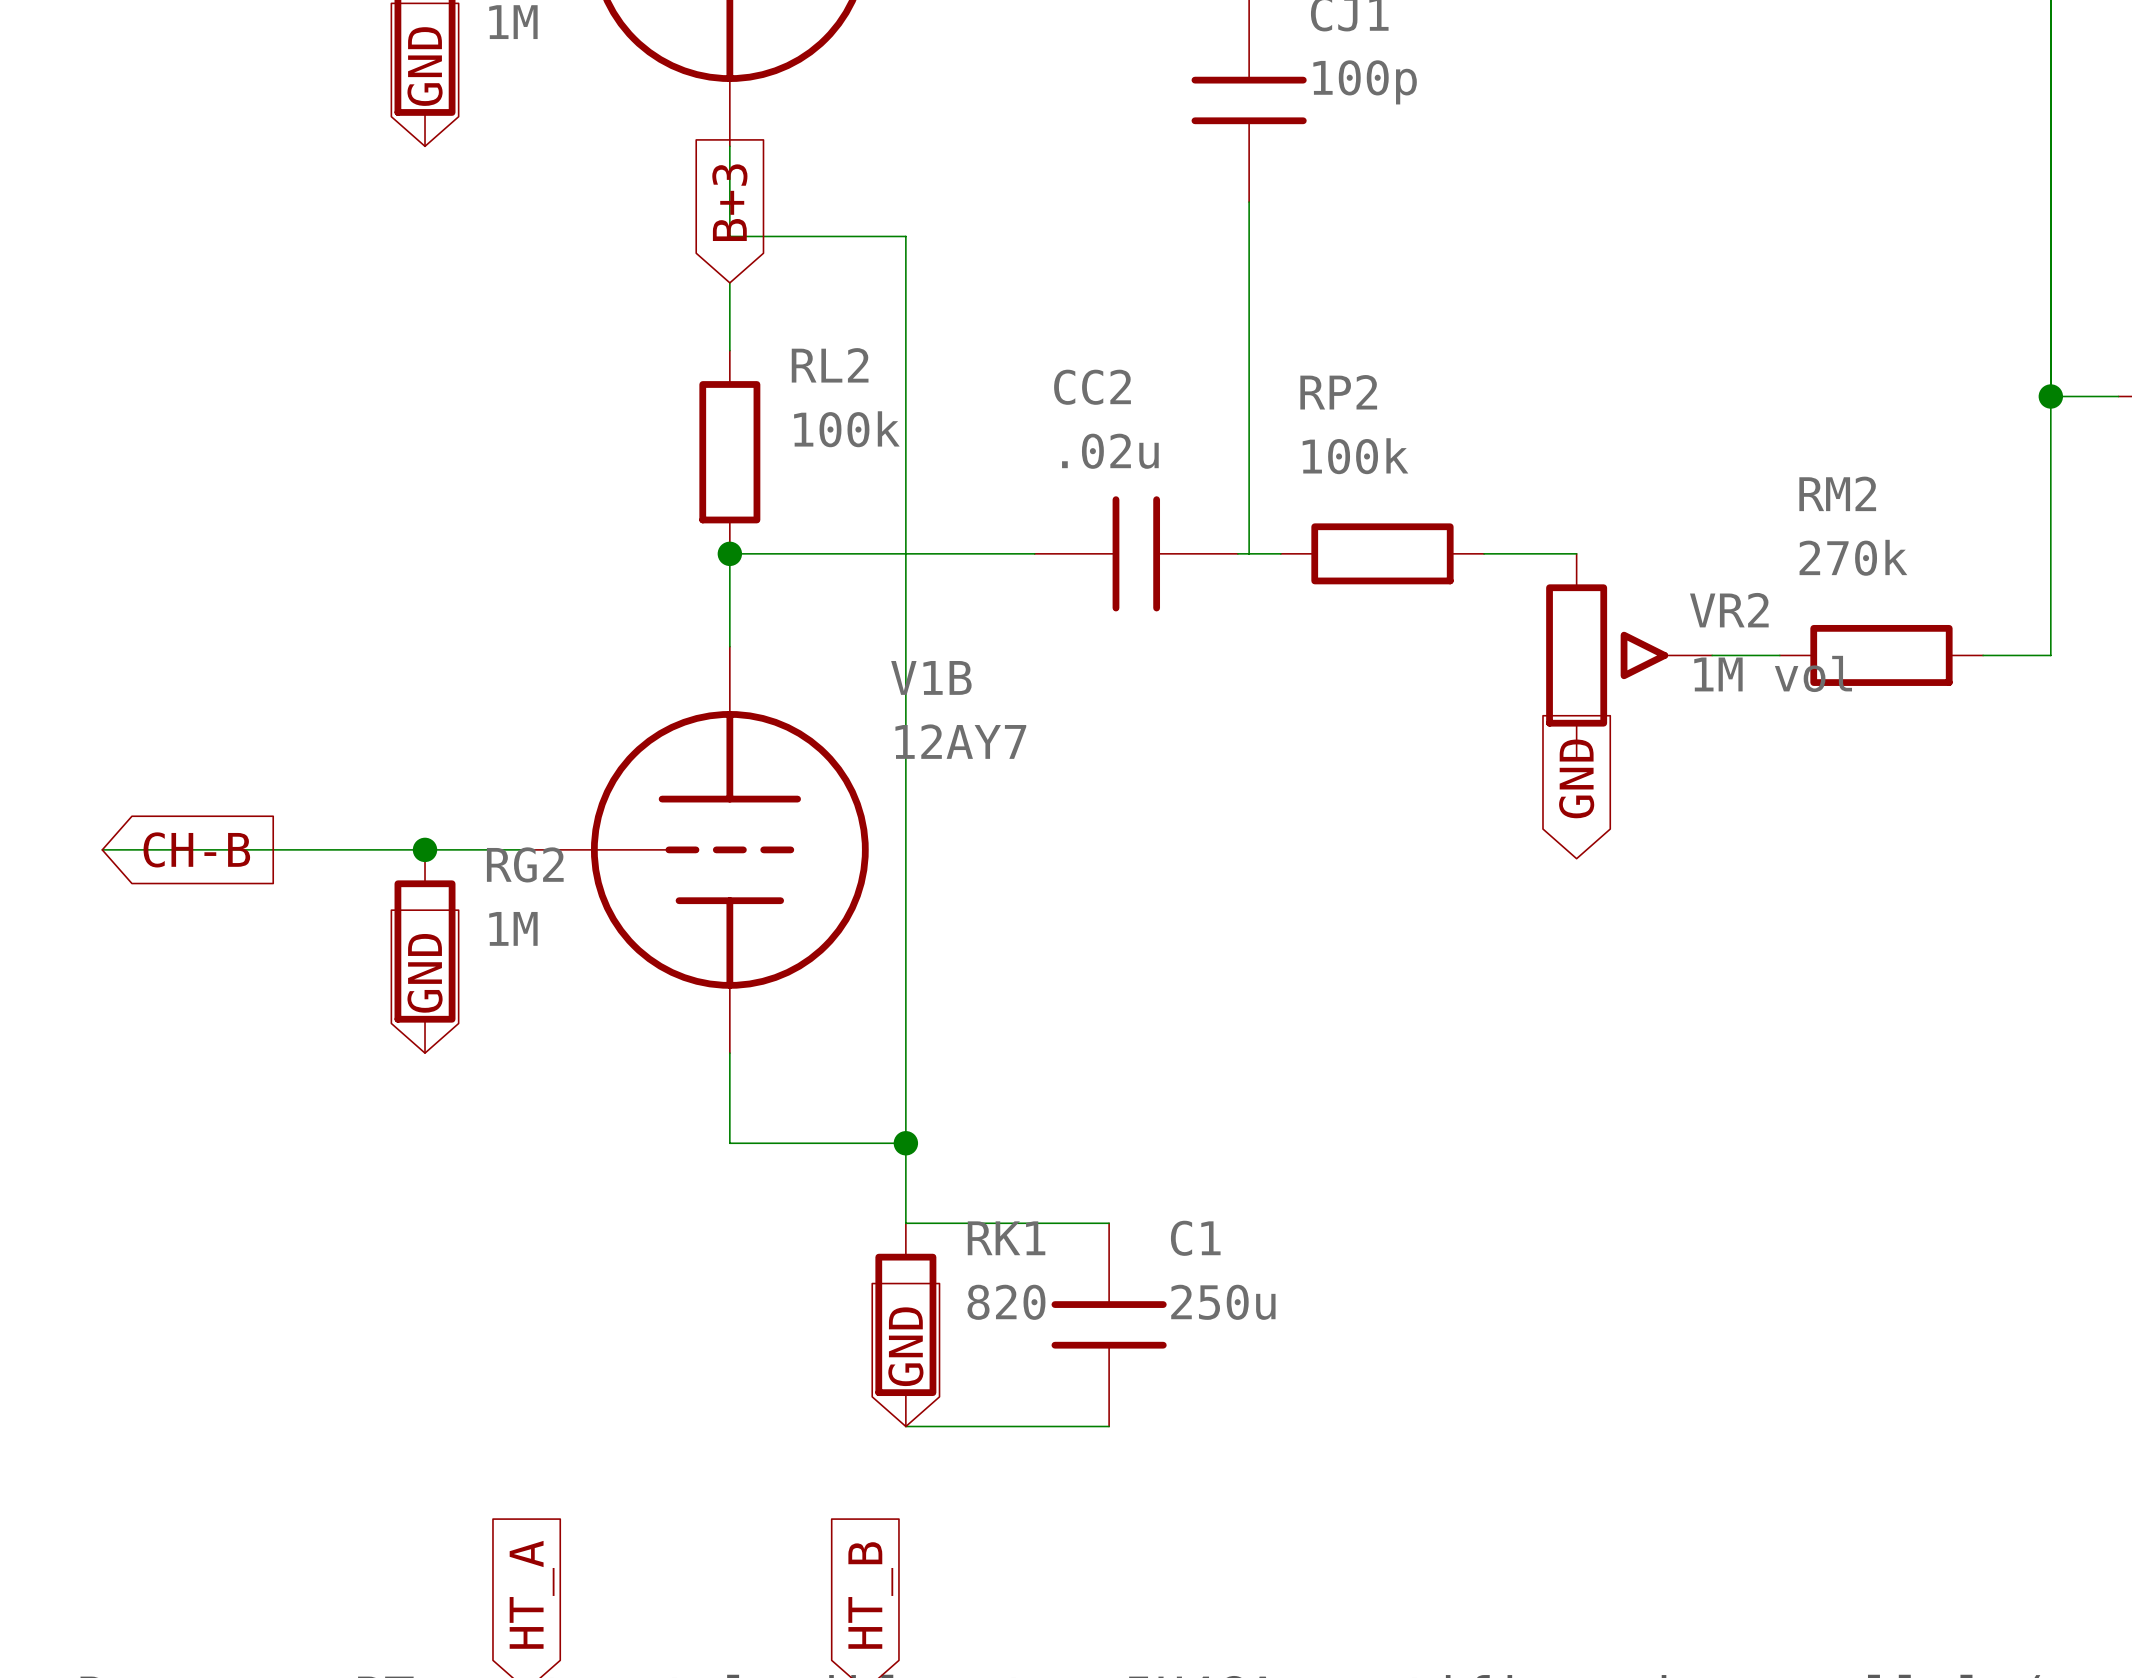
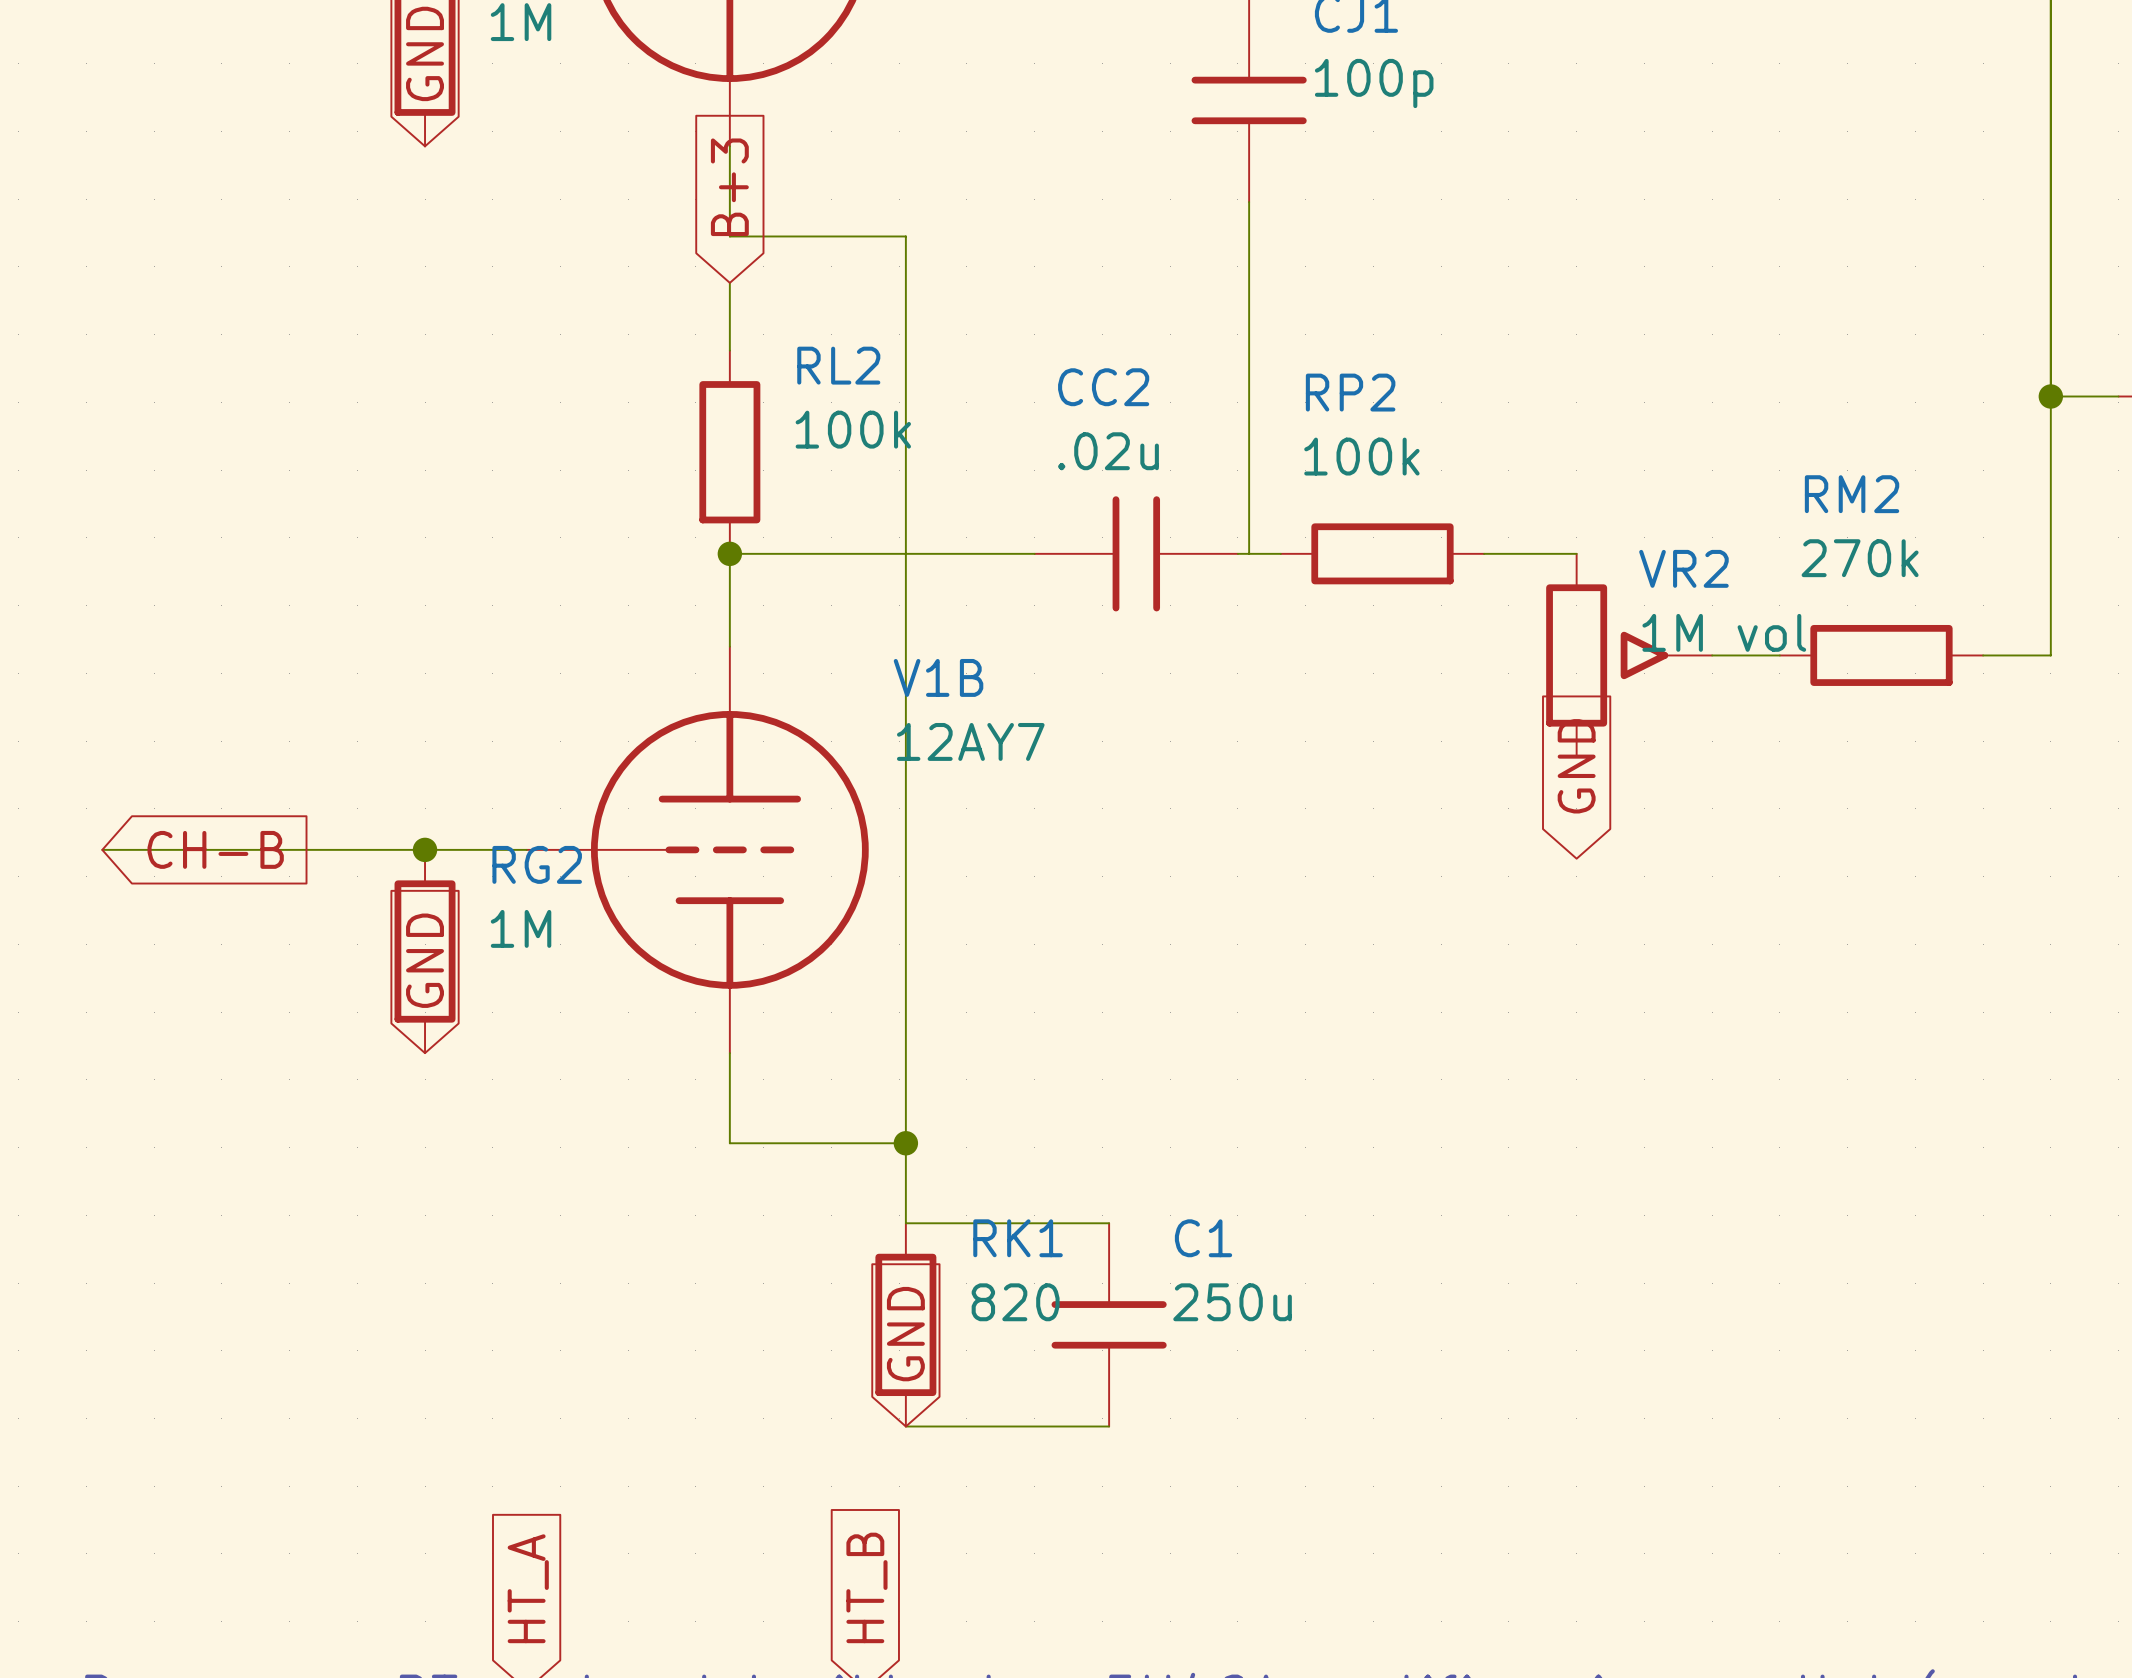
VR2 name position: VR2 (1729, 610) -> VR2 (1683, 568)
VR2 value position: 1M vol (1773, 673) -> 1M vol (1724, 632)

